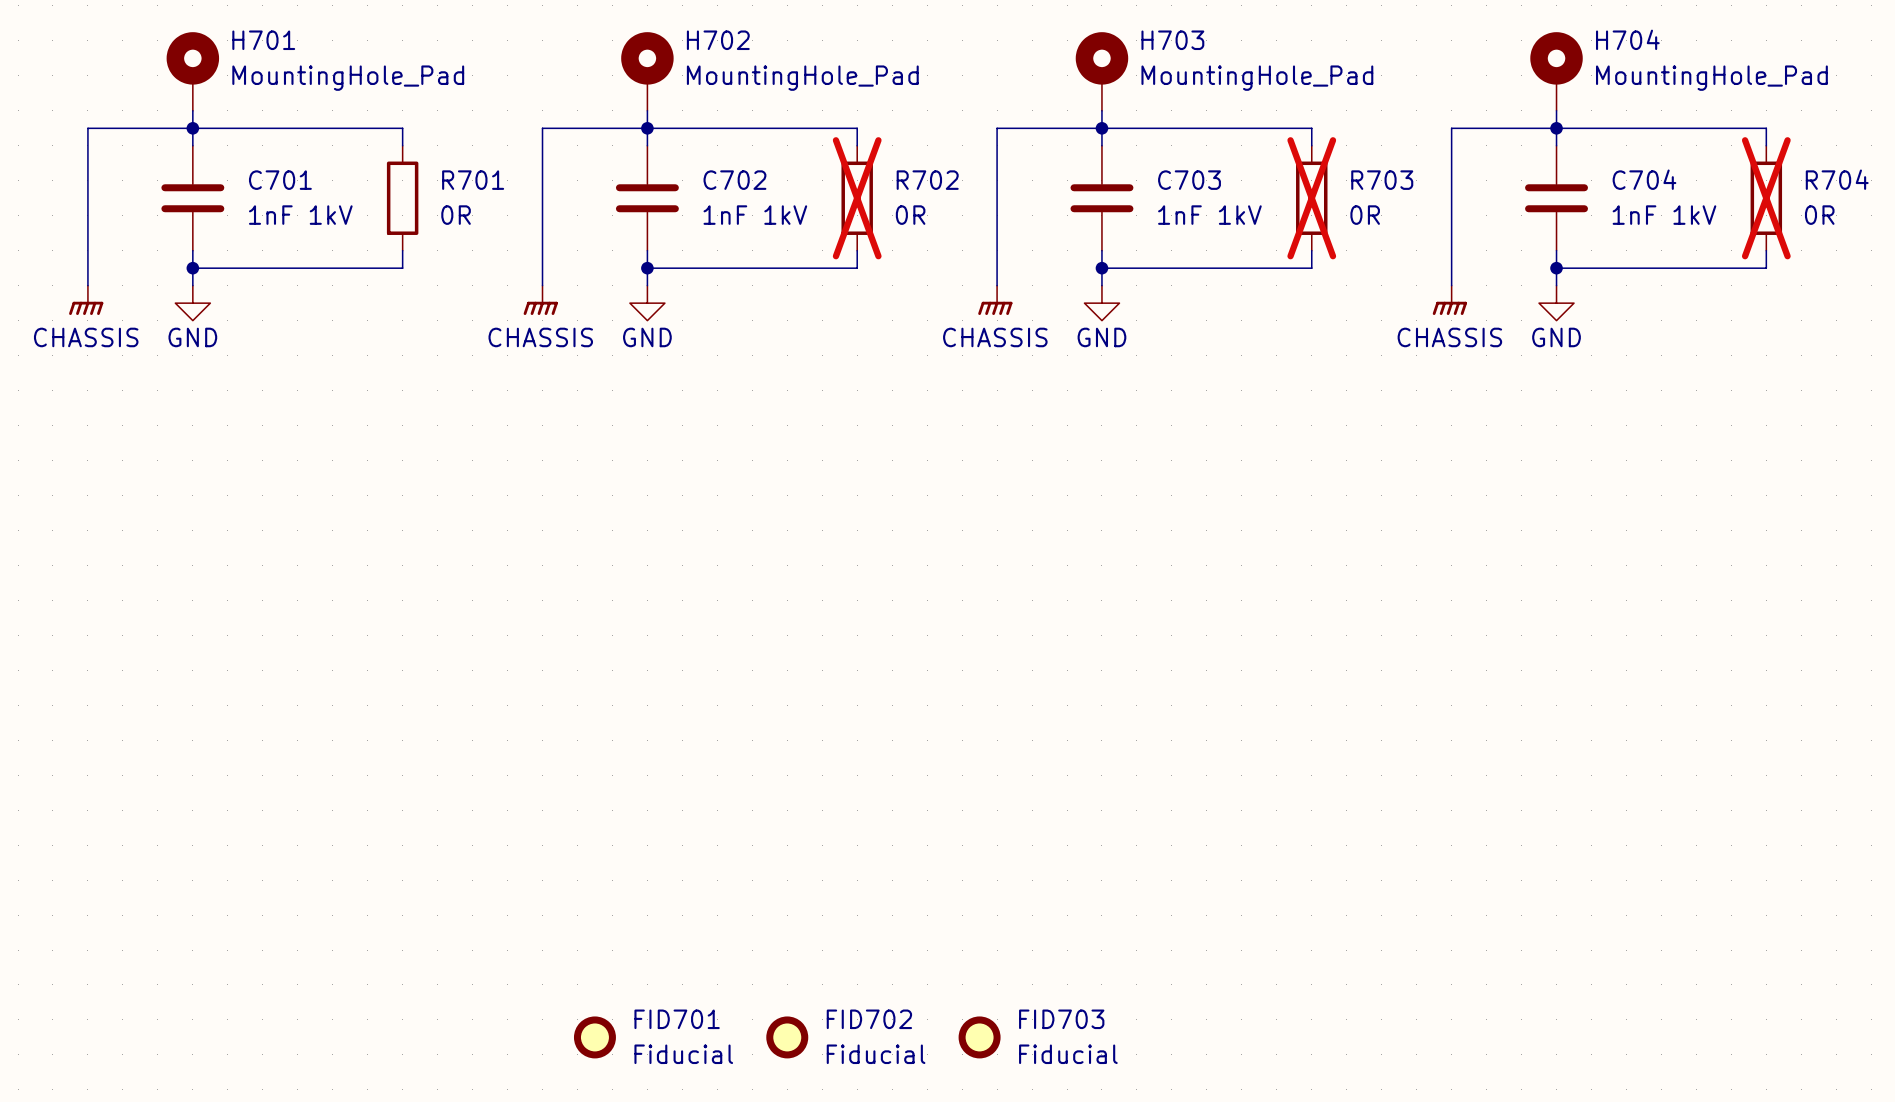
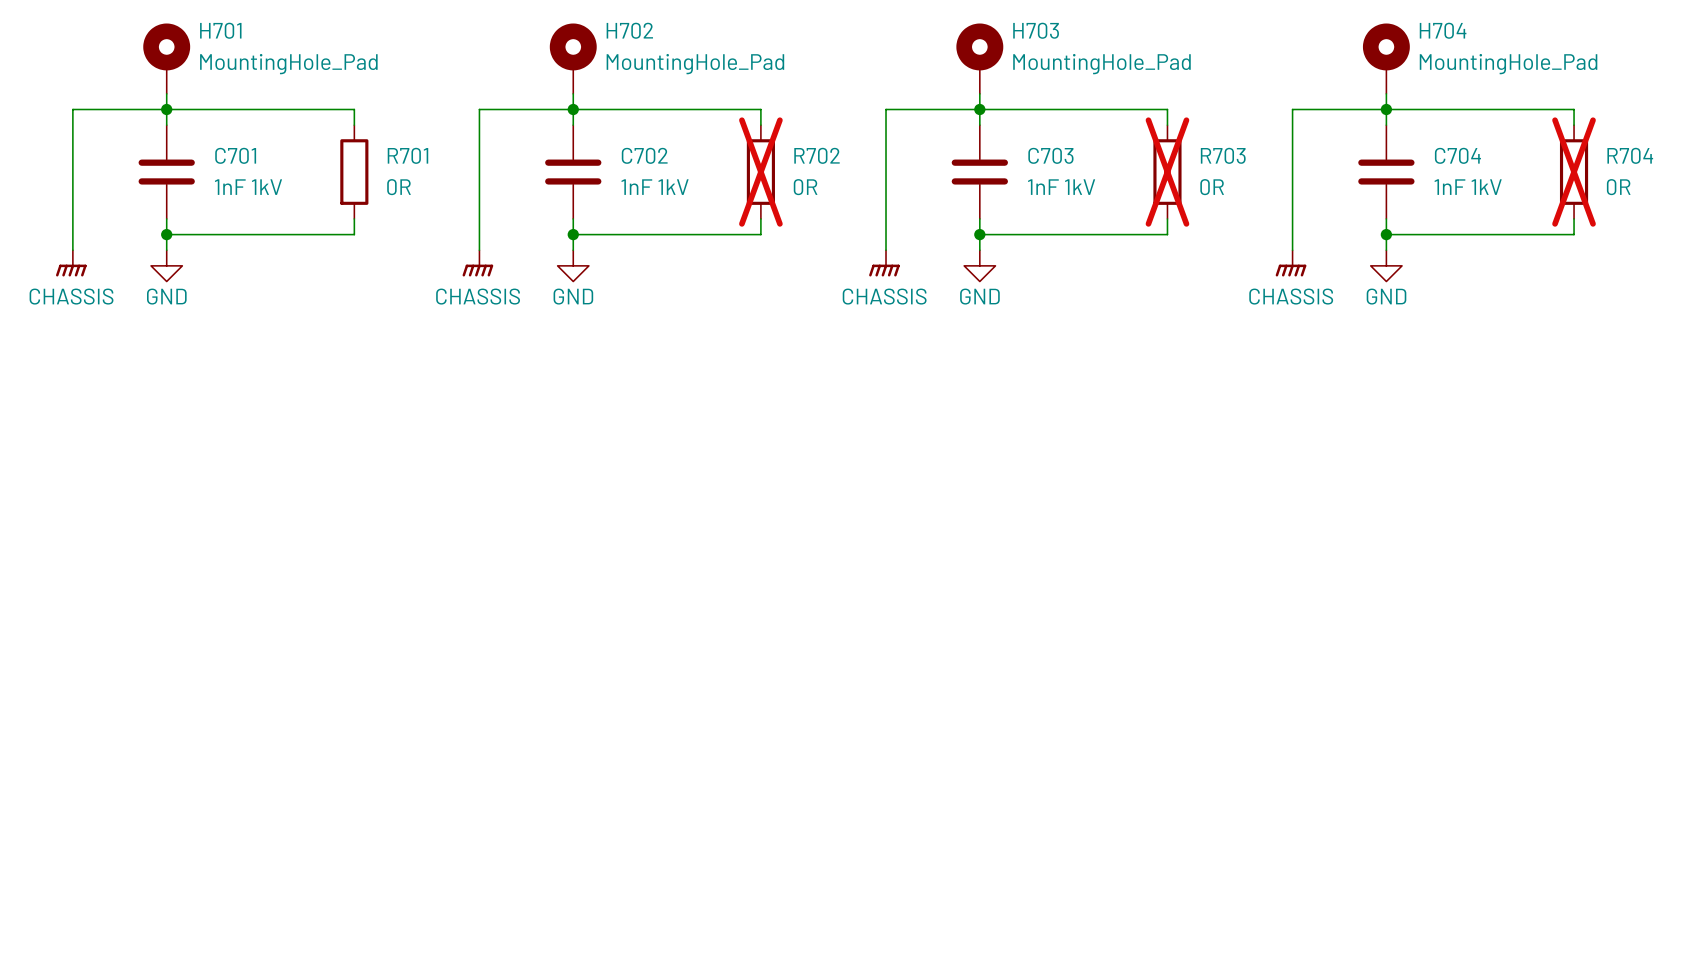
FID701: Fiducial (594, 1037) -> none
FID702: Fiducial (787, 1037) -> none
FID703: Fiducial (979, 1037) -> none

